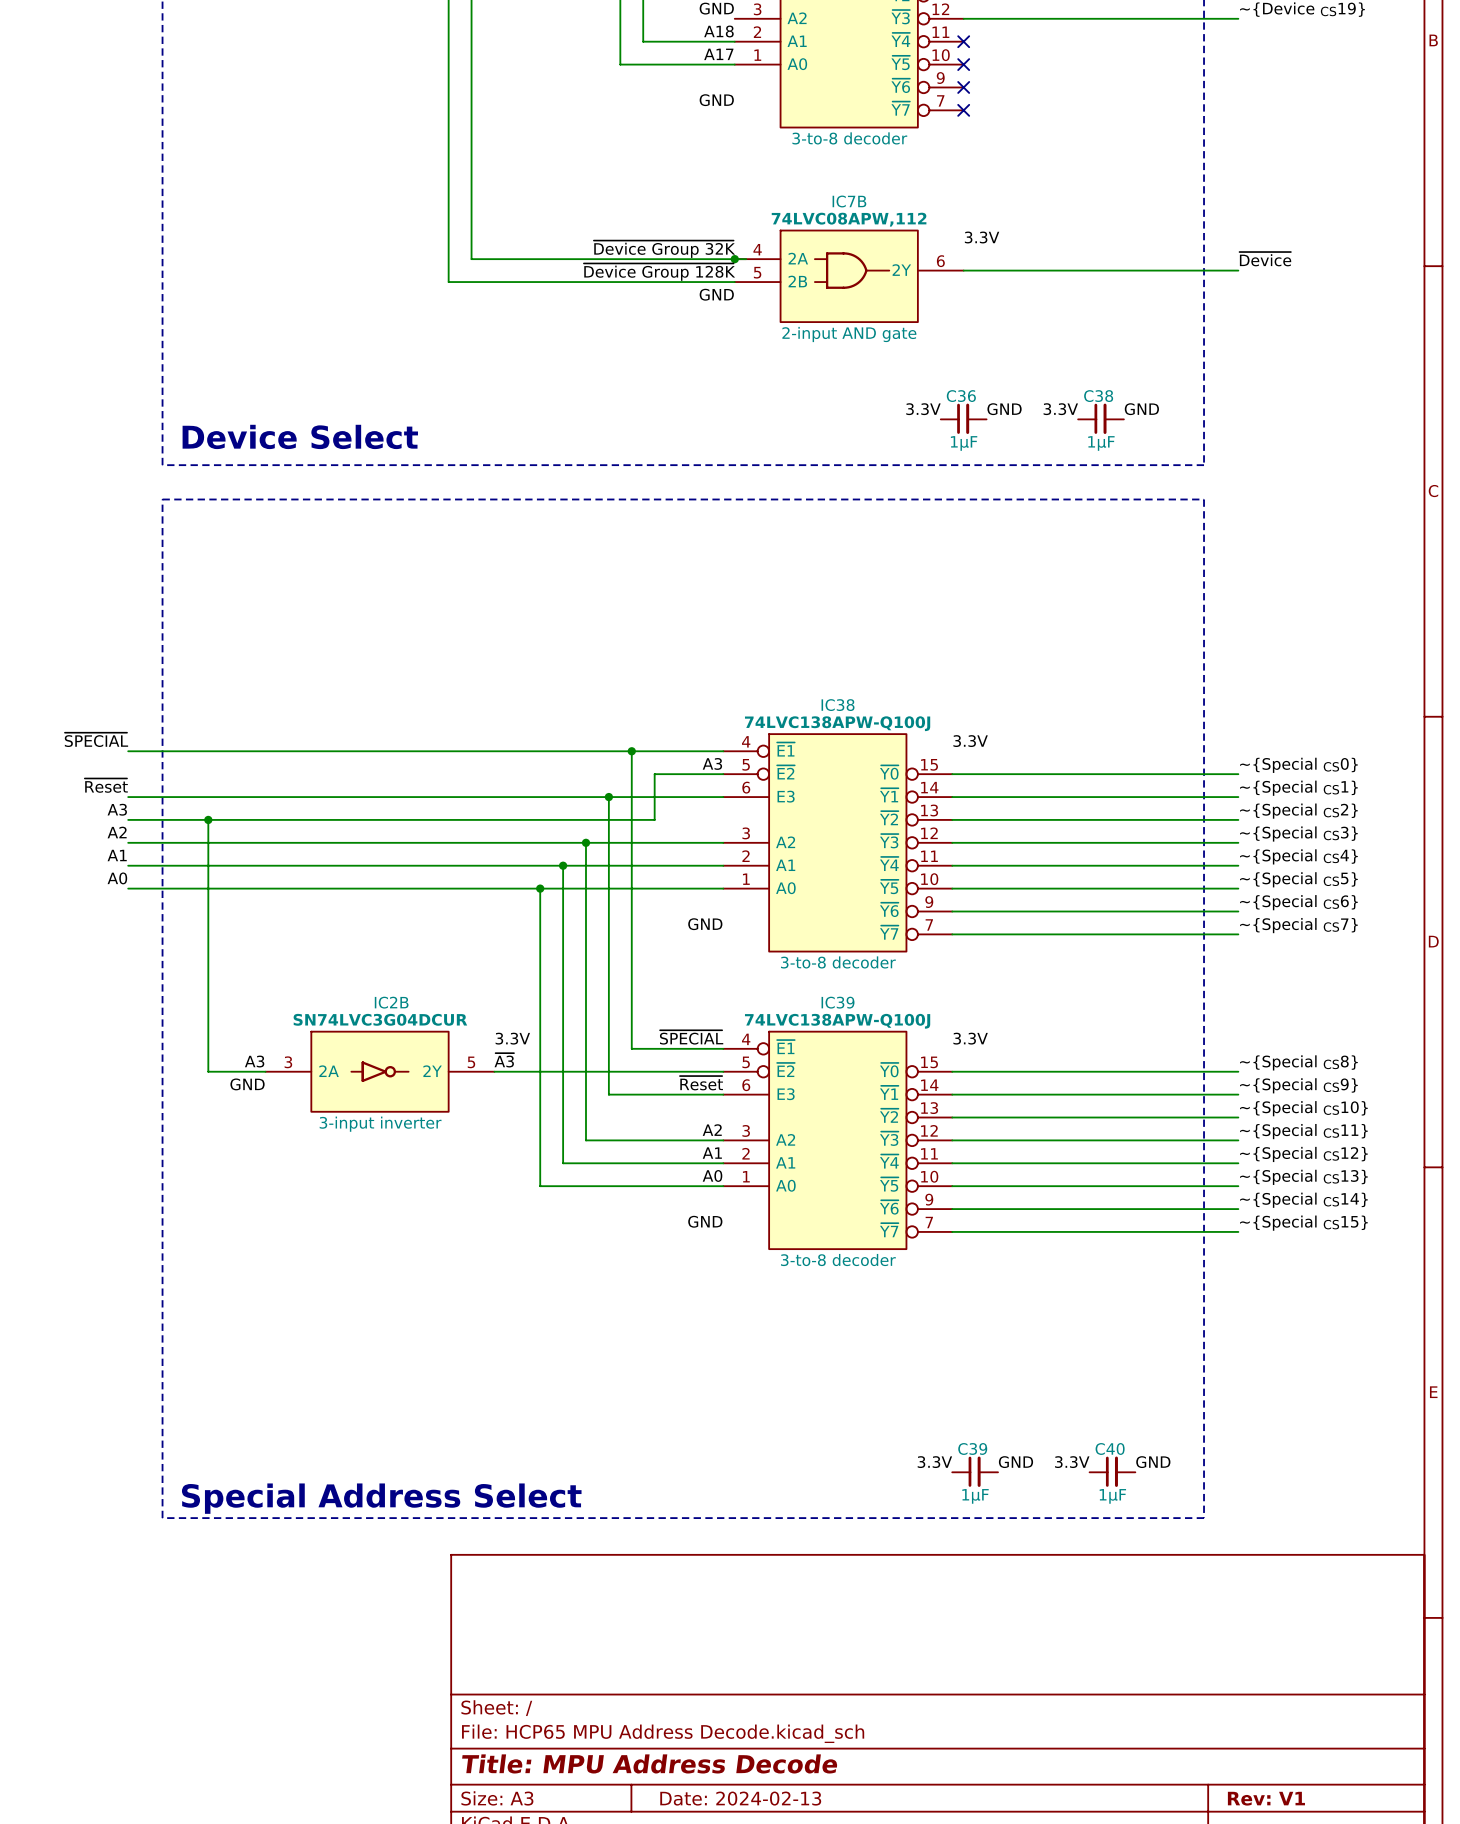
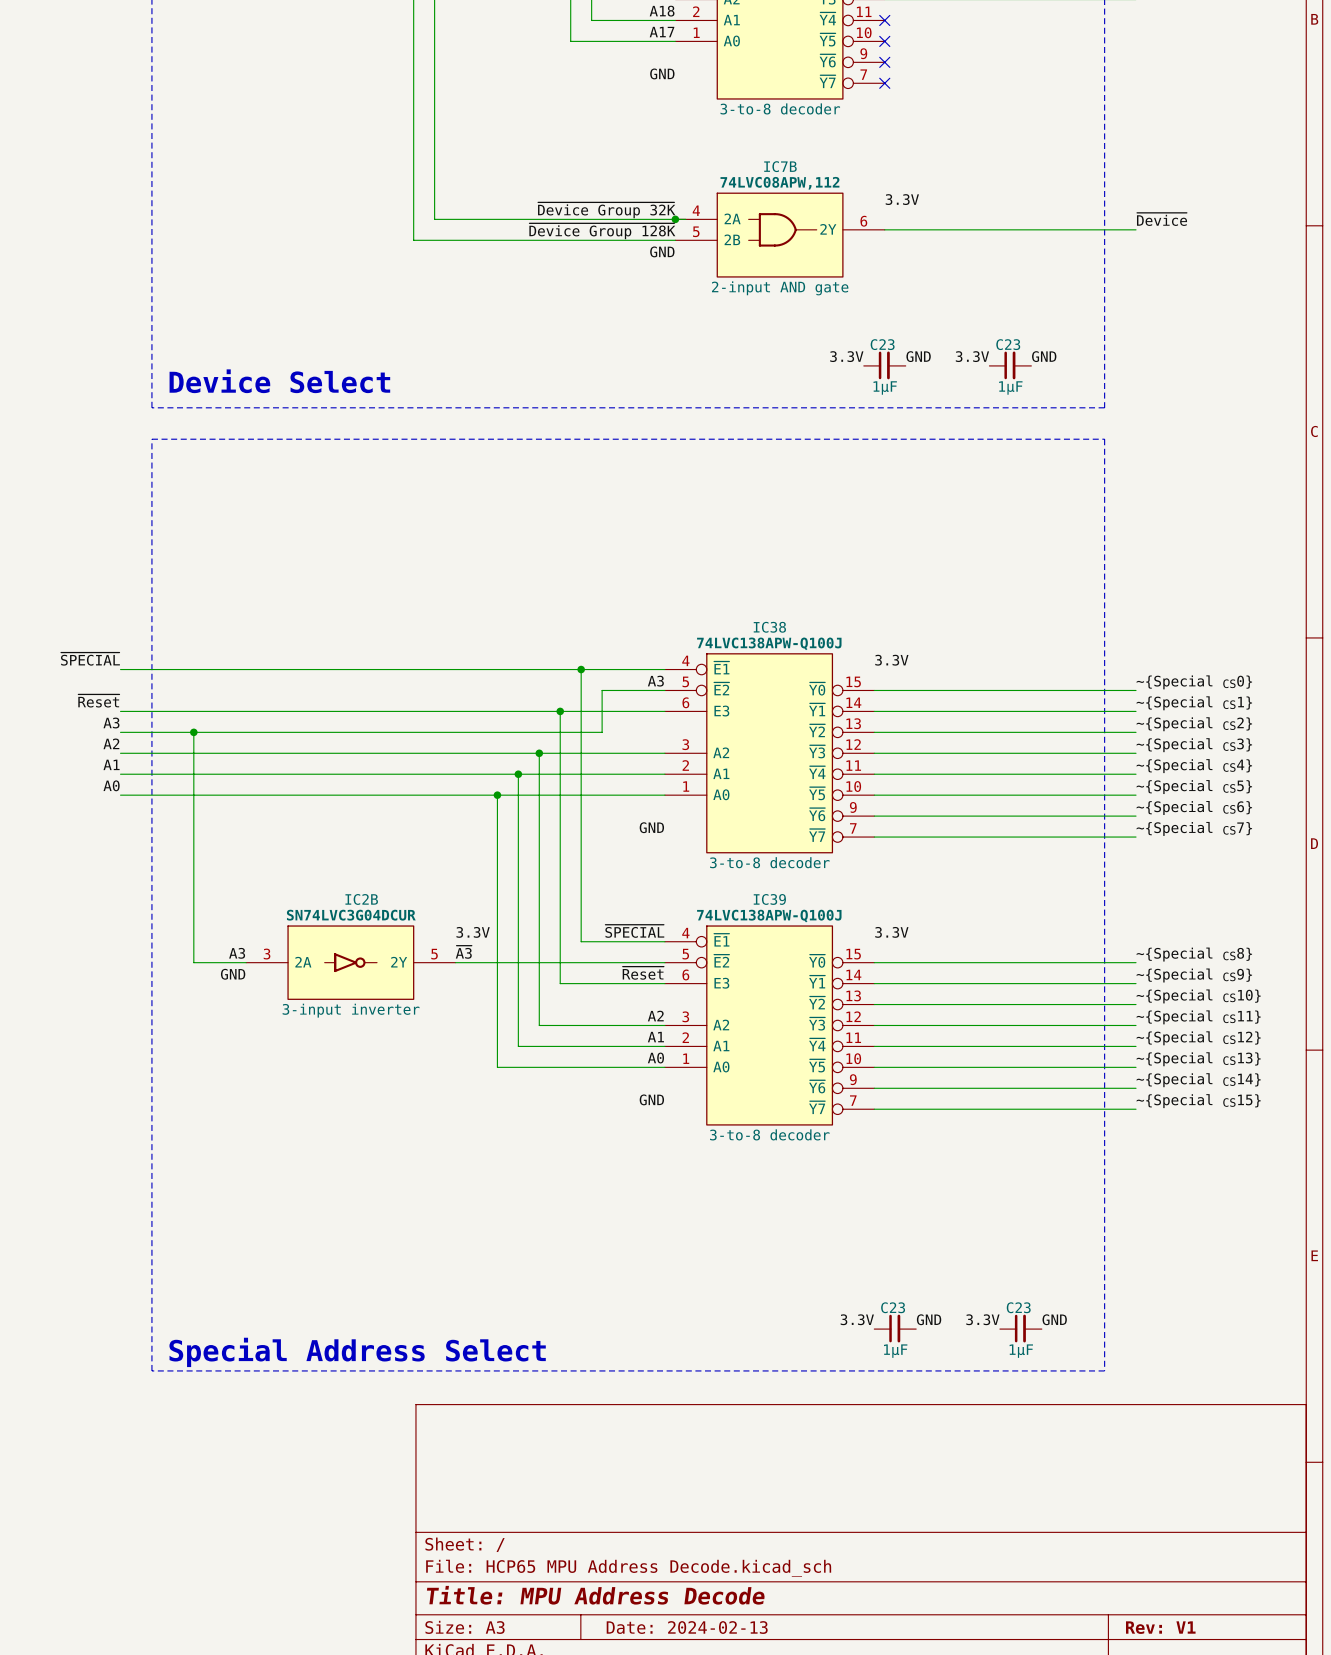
C36 name: C36 (961, 396) -> C23 (882, 344)
C38 name: C38 (1098, 396) -> C23 (1008, 344)
C39 name: C39 (972, 1448) -> C23 (893, 1307)
C40 name: C40 (1110, 1448) -> C23 (1018, 1307)

